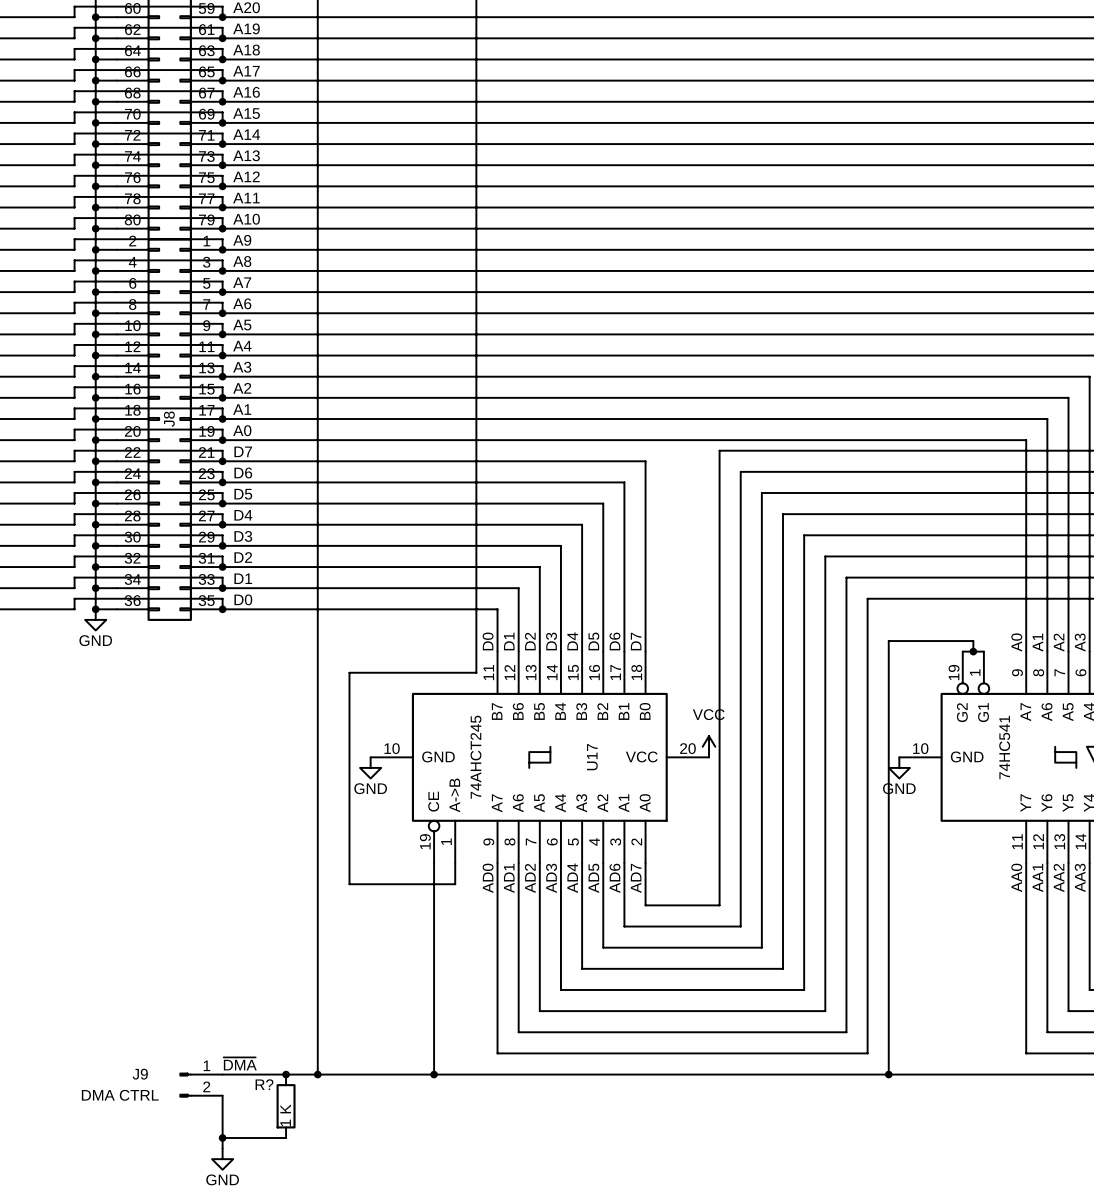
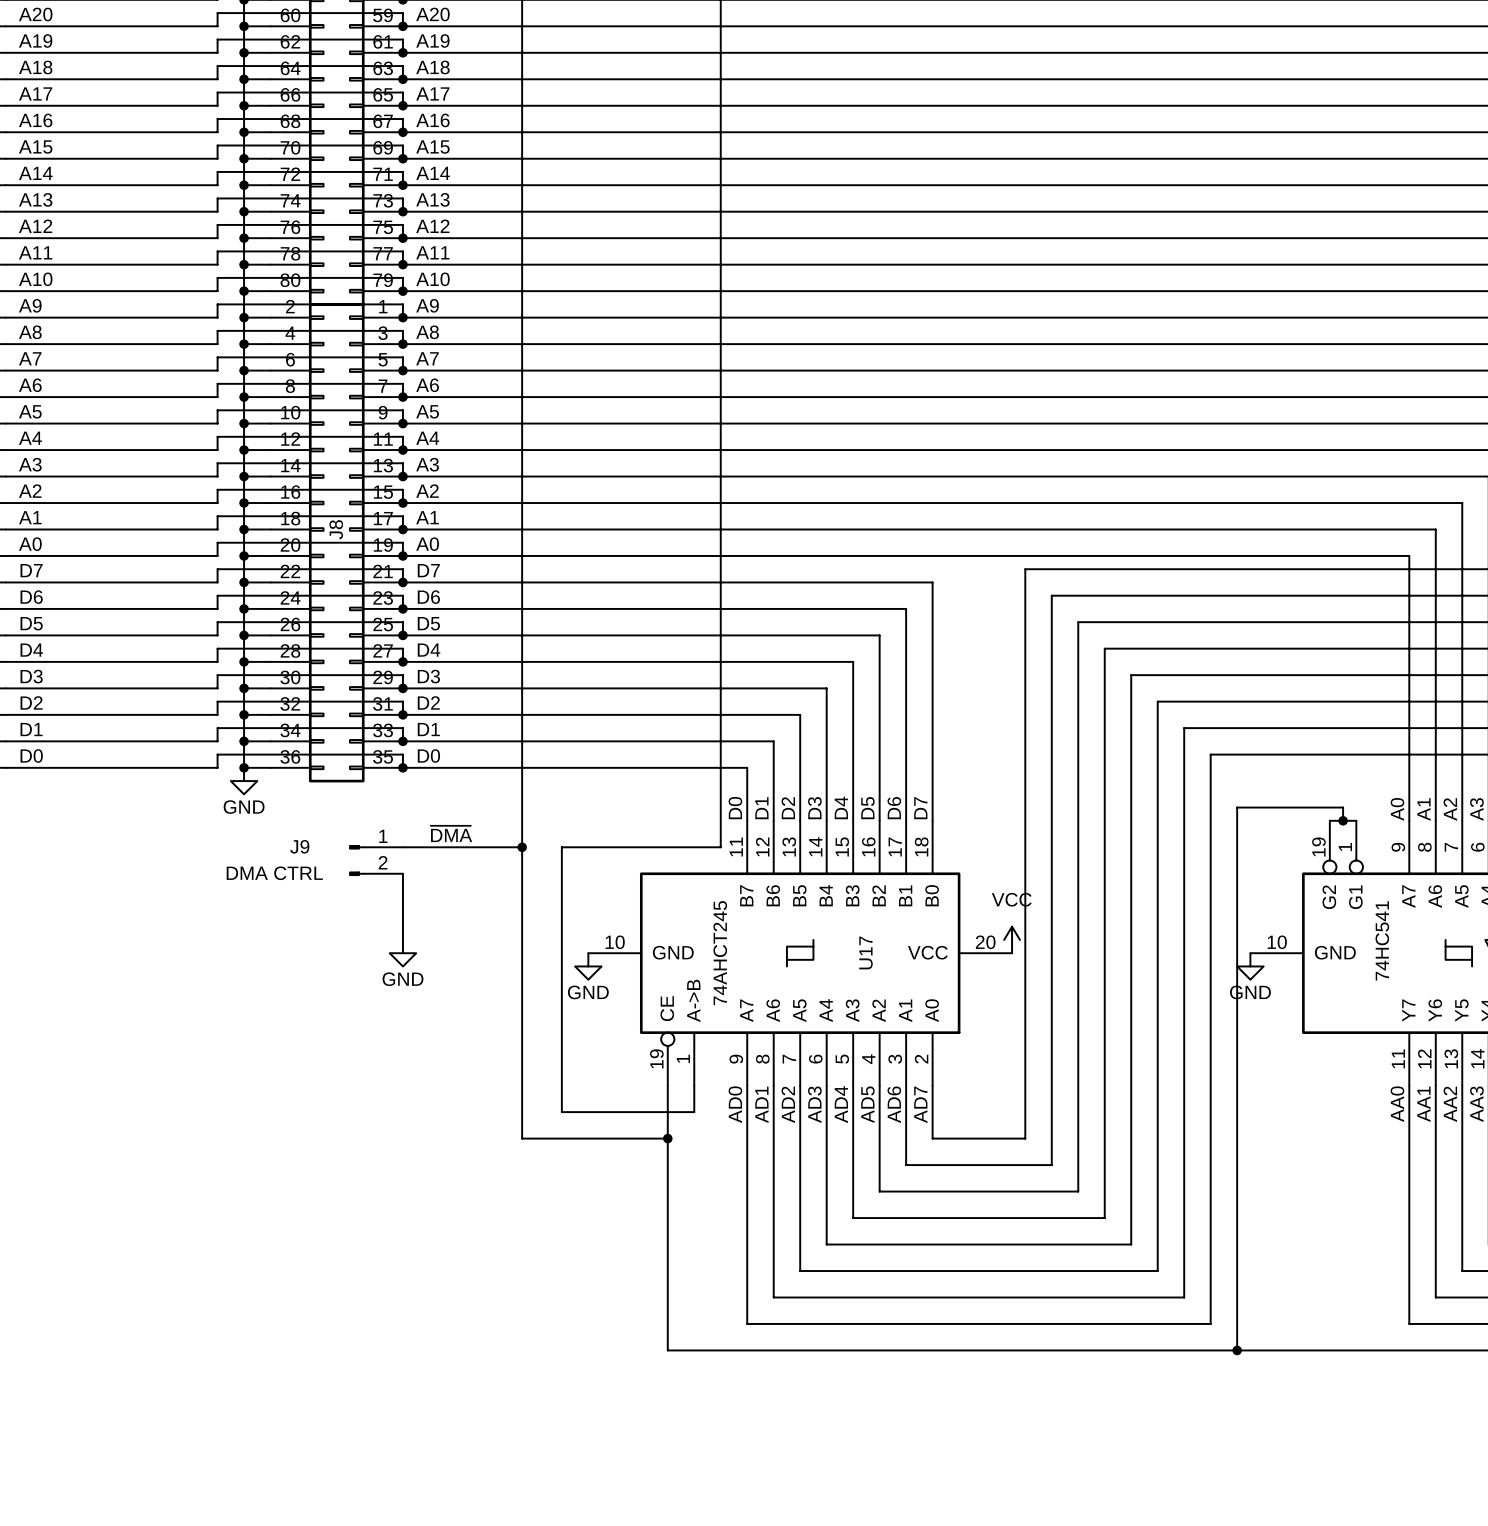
label: none -> ~{DMA} (451, 833)
wire: none -> (402, 847) (522, 847)
junction: none -> (522, 847)
wire: none -> (402, 873) (402, 939)
power symbol: none -> GND (402, 953)
wire: (317, 905) (317, 1074) -> (522, 1138) (667, 1138)
junction: none -> (667, 1138)
label: ~{DMA} (240, 1063) -> none
wire: (222, 1074) (434, 1074) -> none
junction: (286, 1074) -> none
junction: (317, 1074) -> none
junction: (434, 1074) -> none
J9 position: (201, 1085) -> (376, 860)
wire: (222, 1095) (222, 1148) -> none
R?: 1 K (286, 1106) -> none
wire: (222, 1138) (286, 1138) -> none
junction: (222, 1138) -> none
power symbol: GND (222, 1159) -> none

